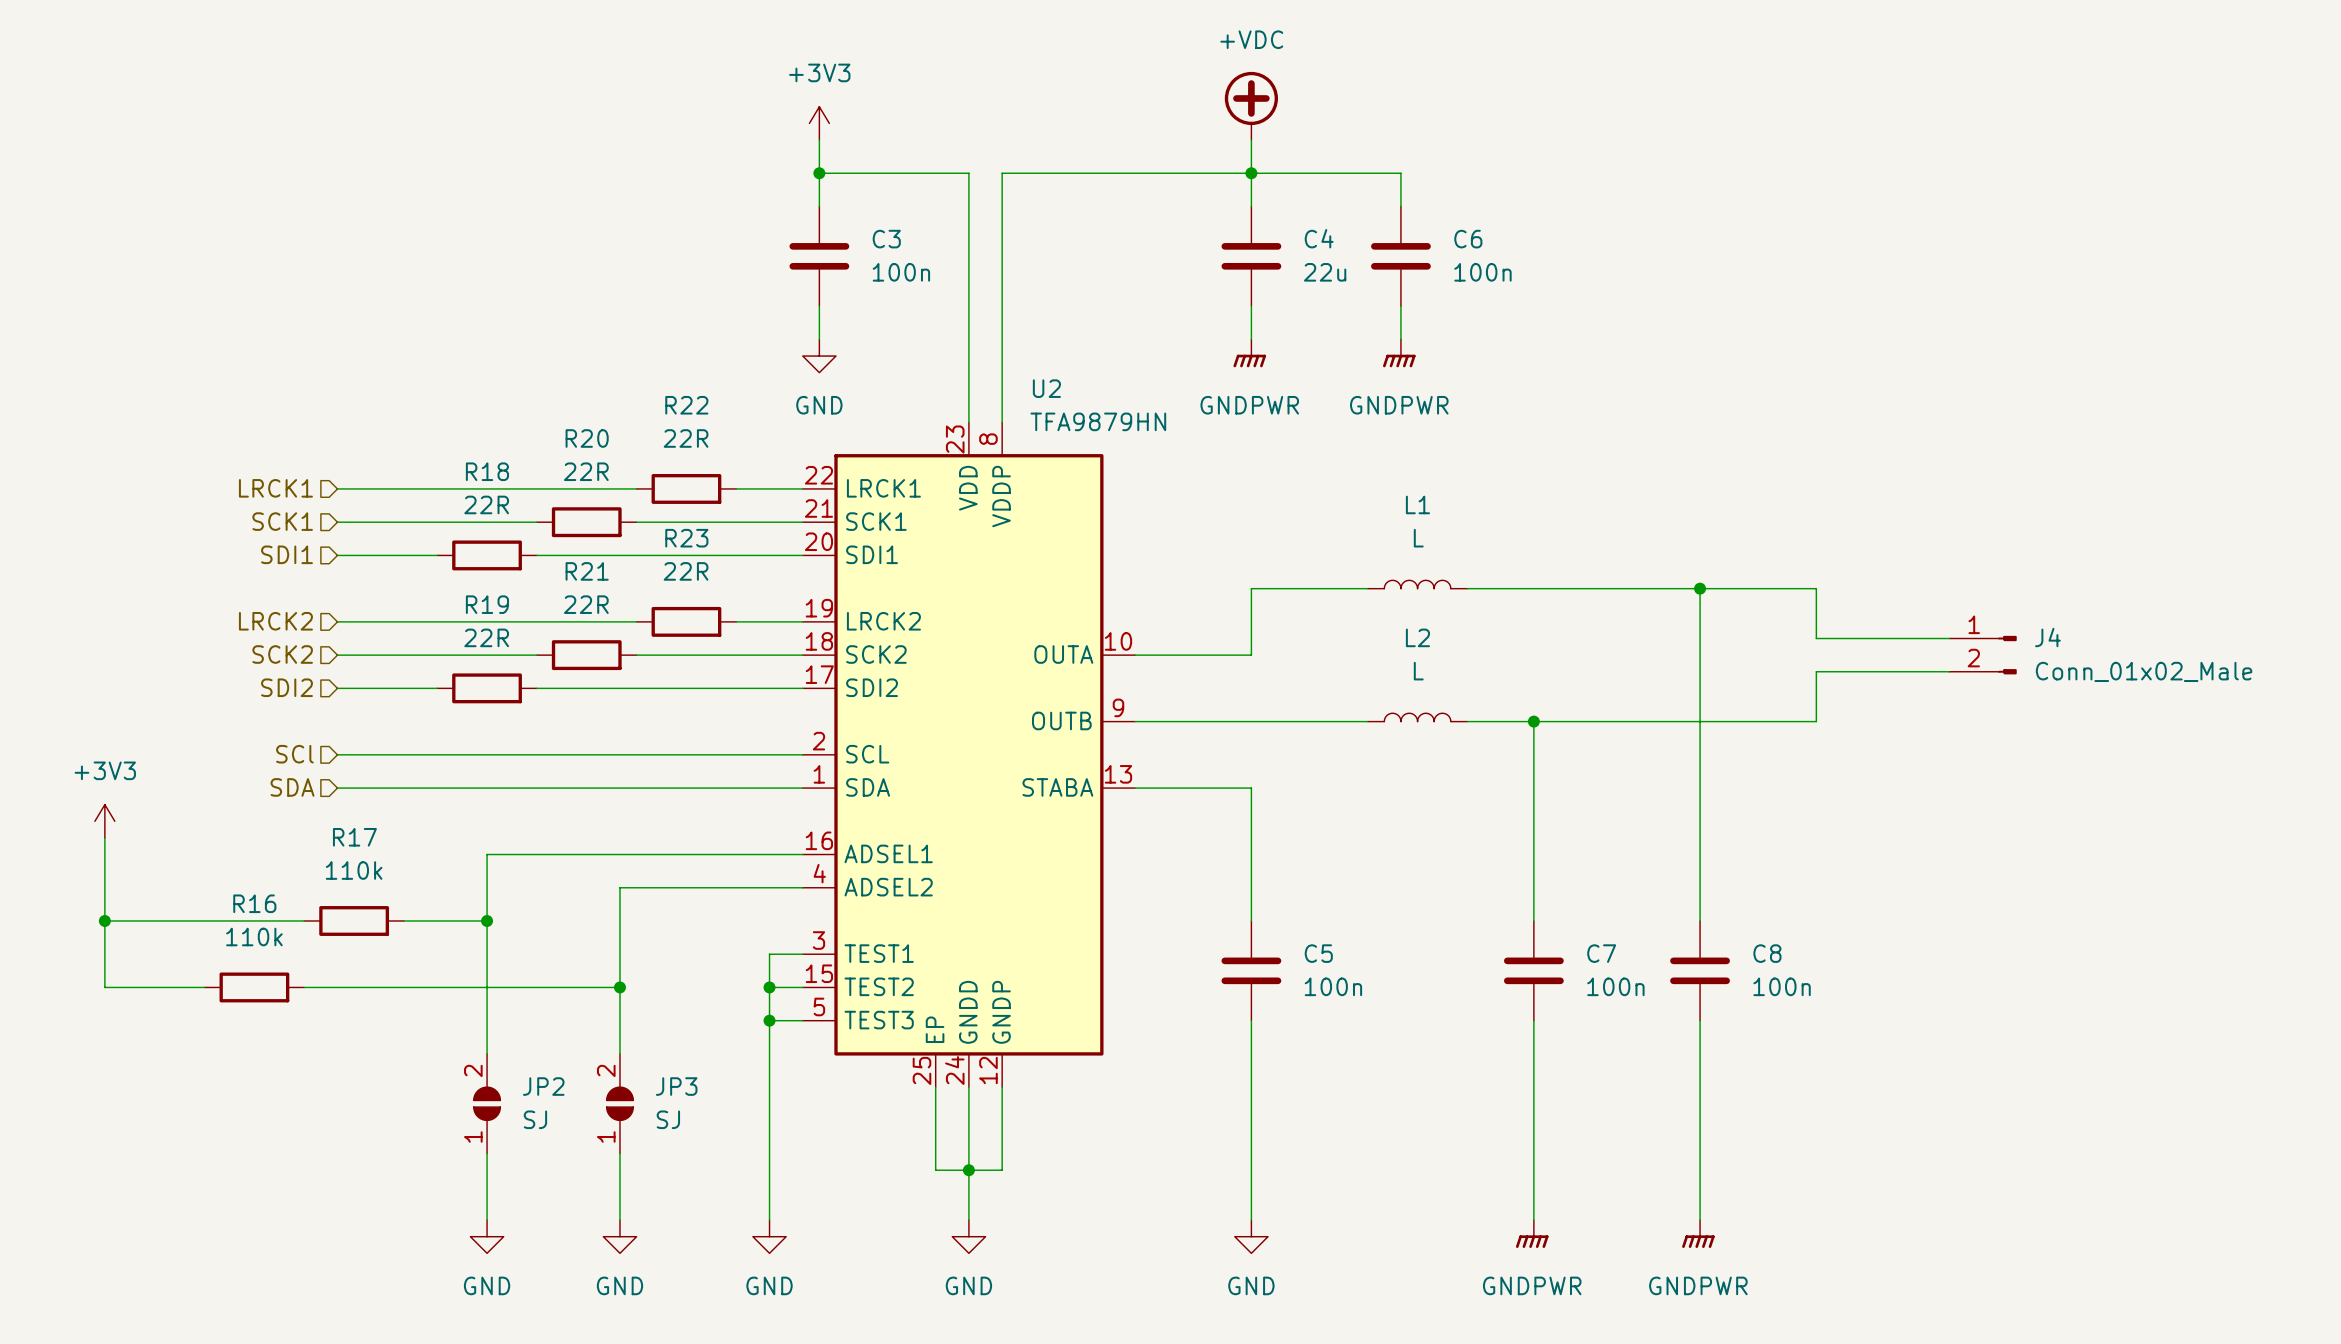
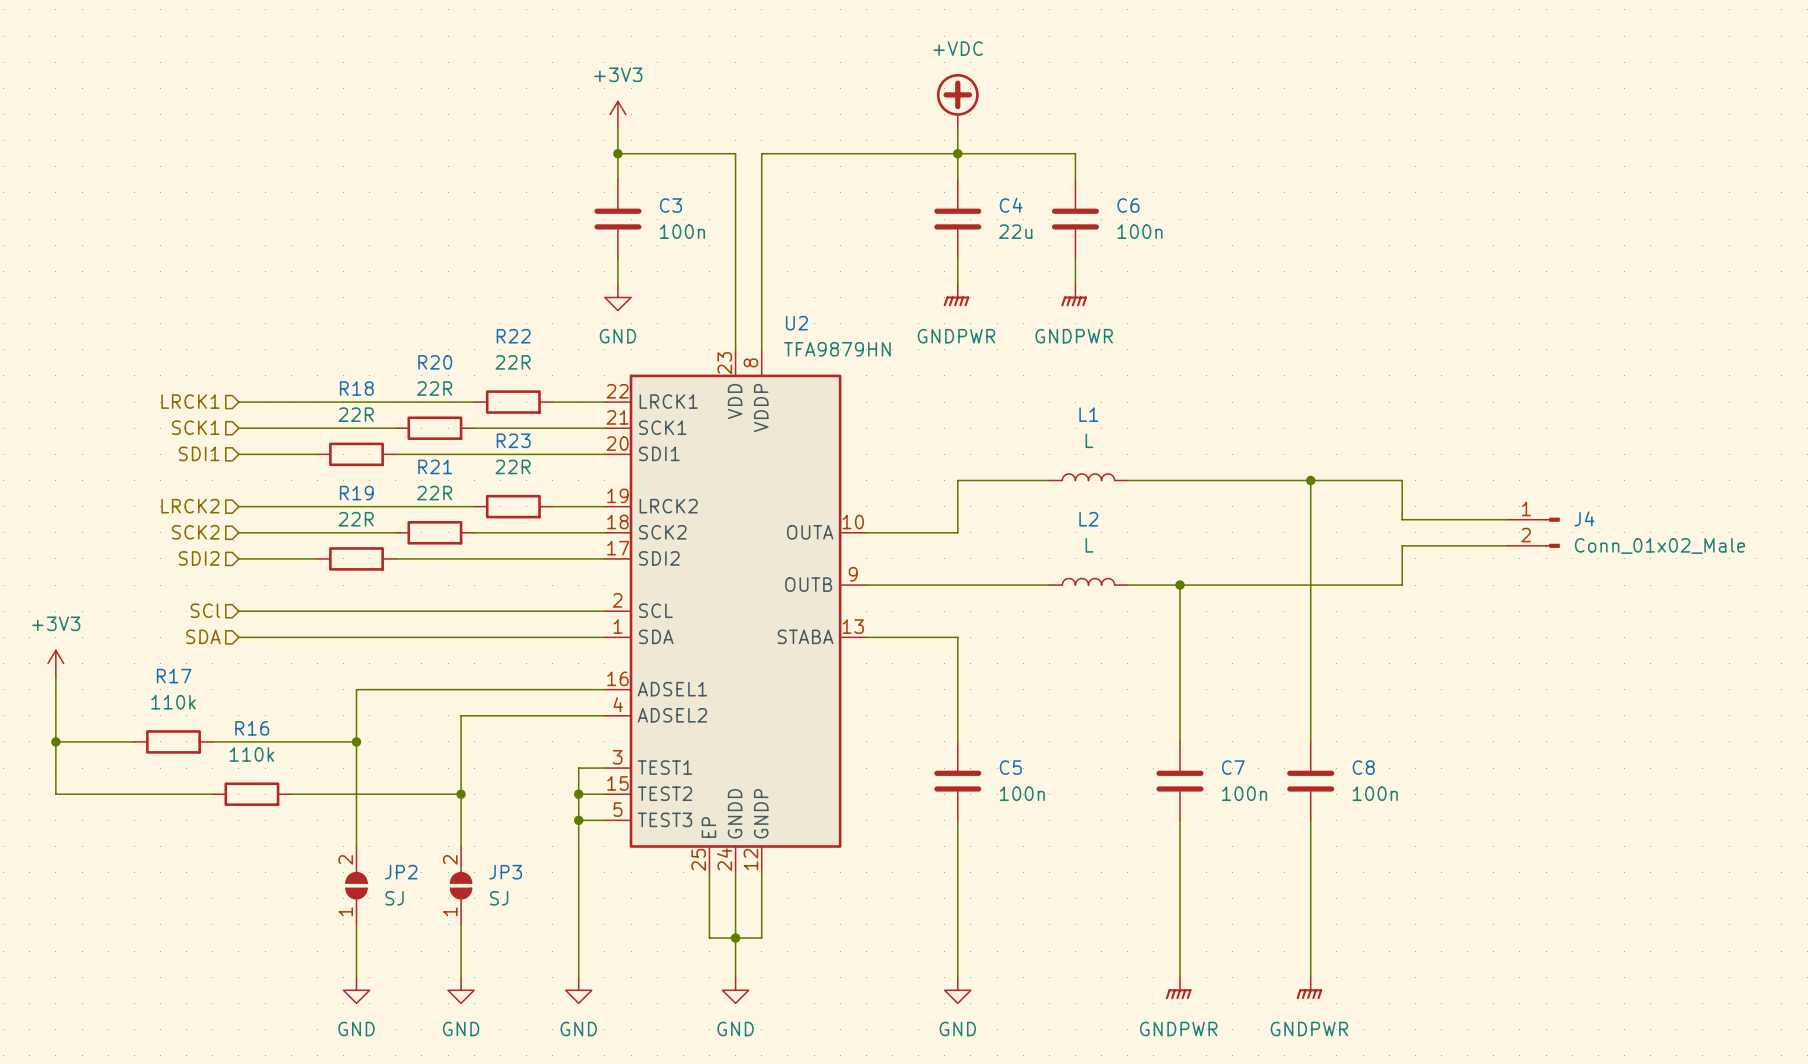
wire: (204, 920) (304, 920) -> (291, 741) (212, 741)
R17 position: (354, 920) -> (173, 741)
R16 position: (254, 987) -> (251, 794)
wire: (304, 987) (403, 987) -> (212, 794) (134, 794)

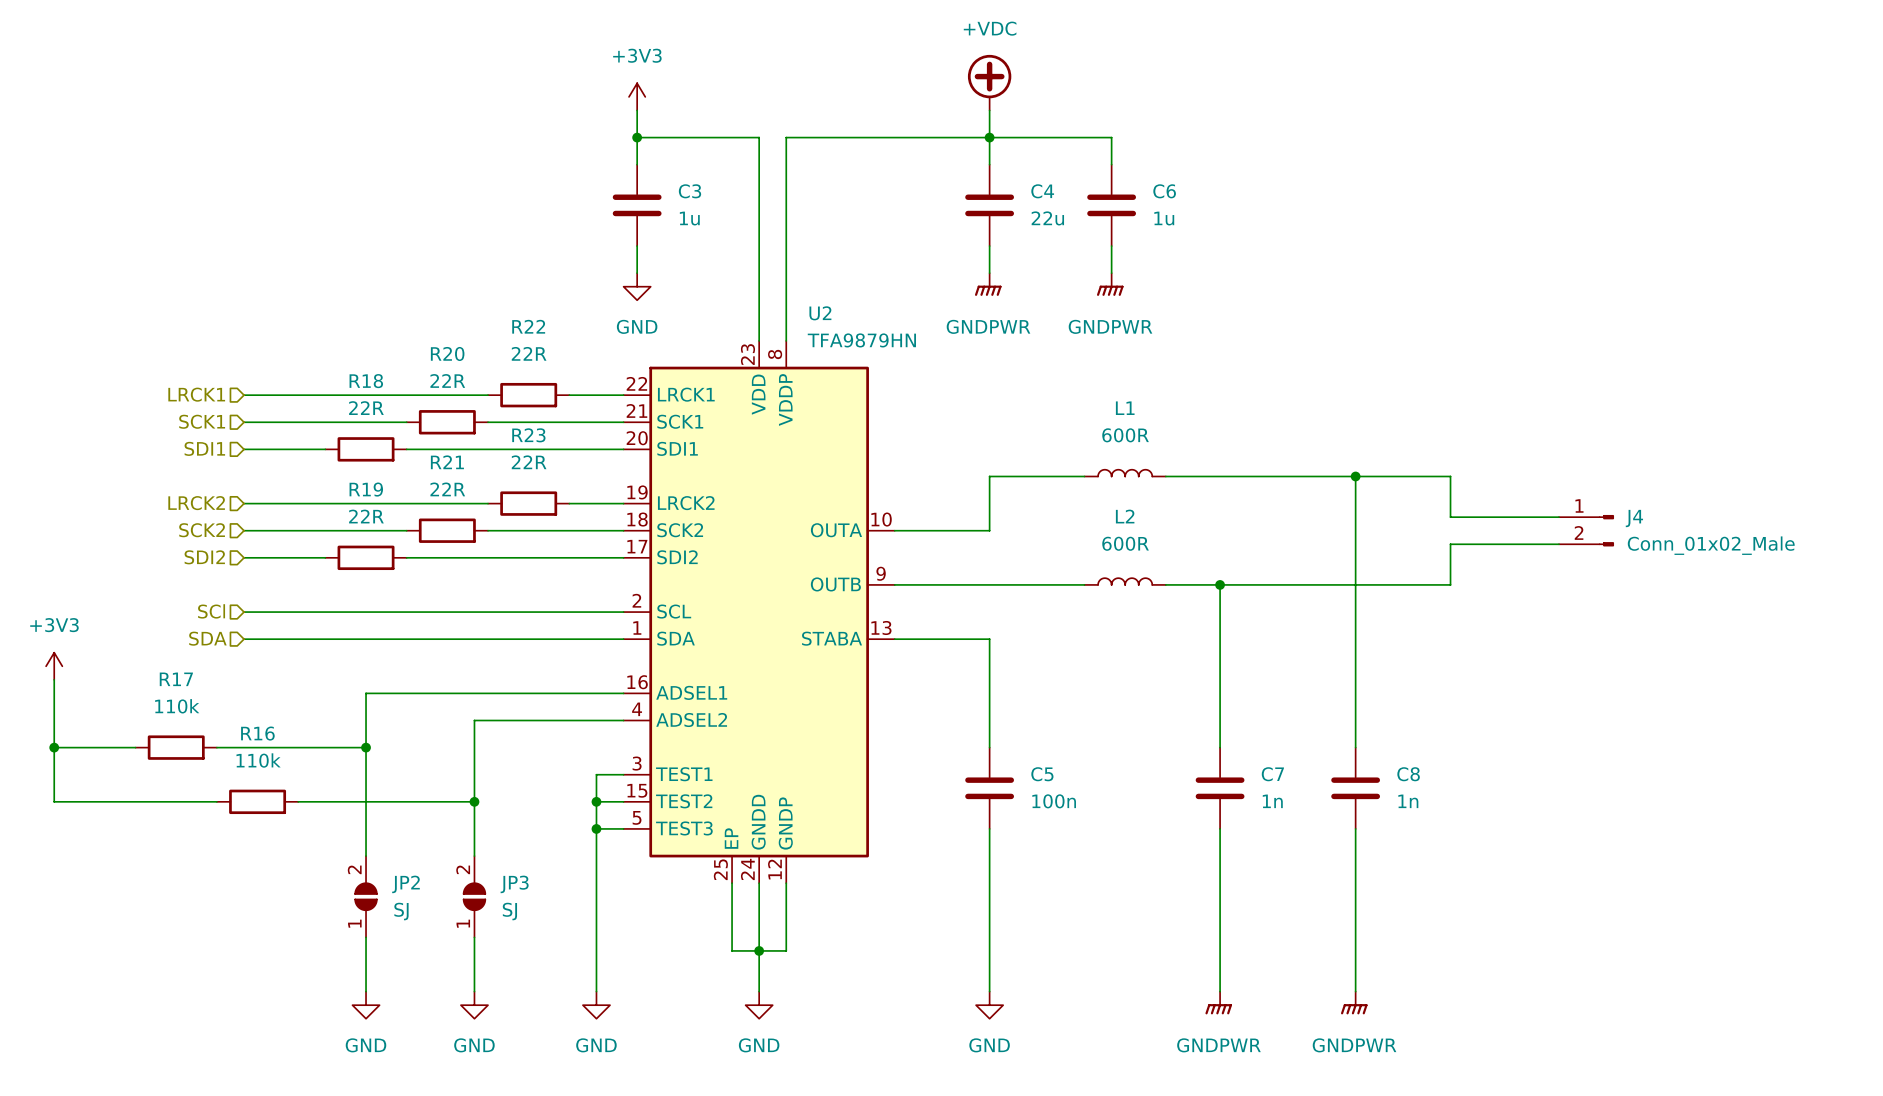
C3 value: 100n (682, 231) -> 1u (689, 218)
C6 value: 100n (1139, 231) -> 1u (1164, 218)
L1 value: L (1089, 440) -> 600R (1125, 435)
L2 value: L (1089, 545) -> 600R (1125, 543)
C7 value: 100n (1244, 793) -> 1n (1272, 801)
C8 value: 100n (1375, 793) -> 1n (1408, 801)

